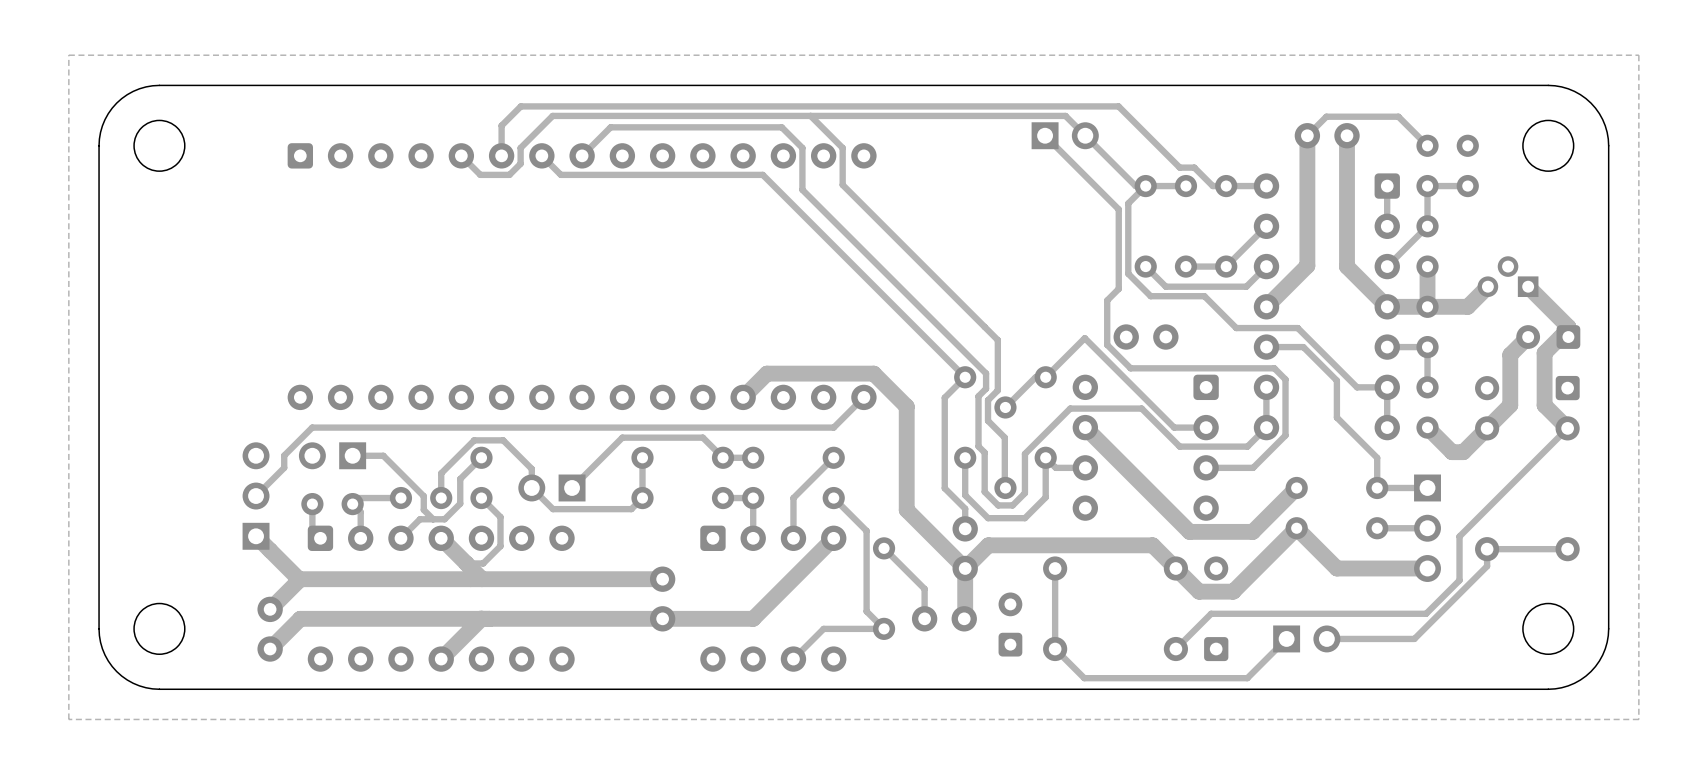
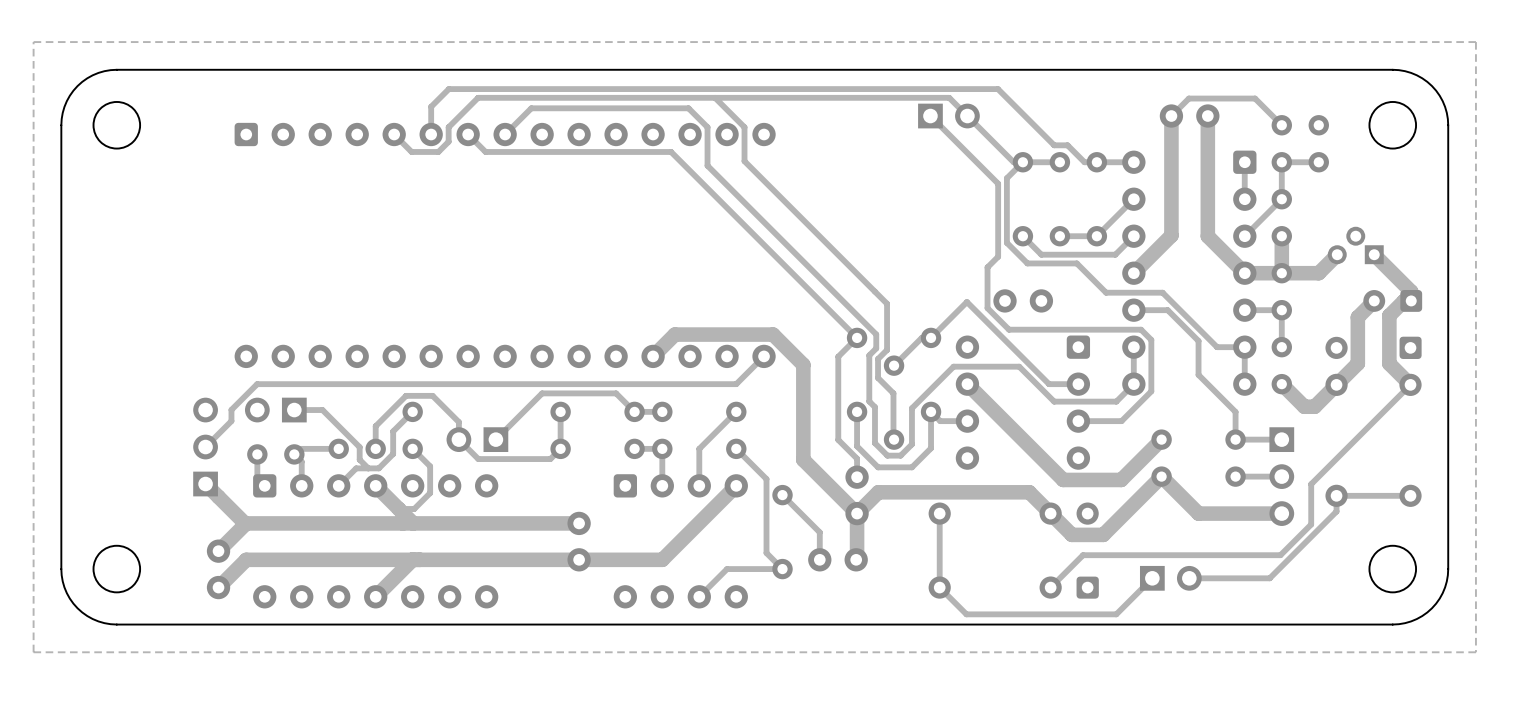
part: (1010, 624) -> none

